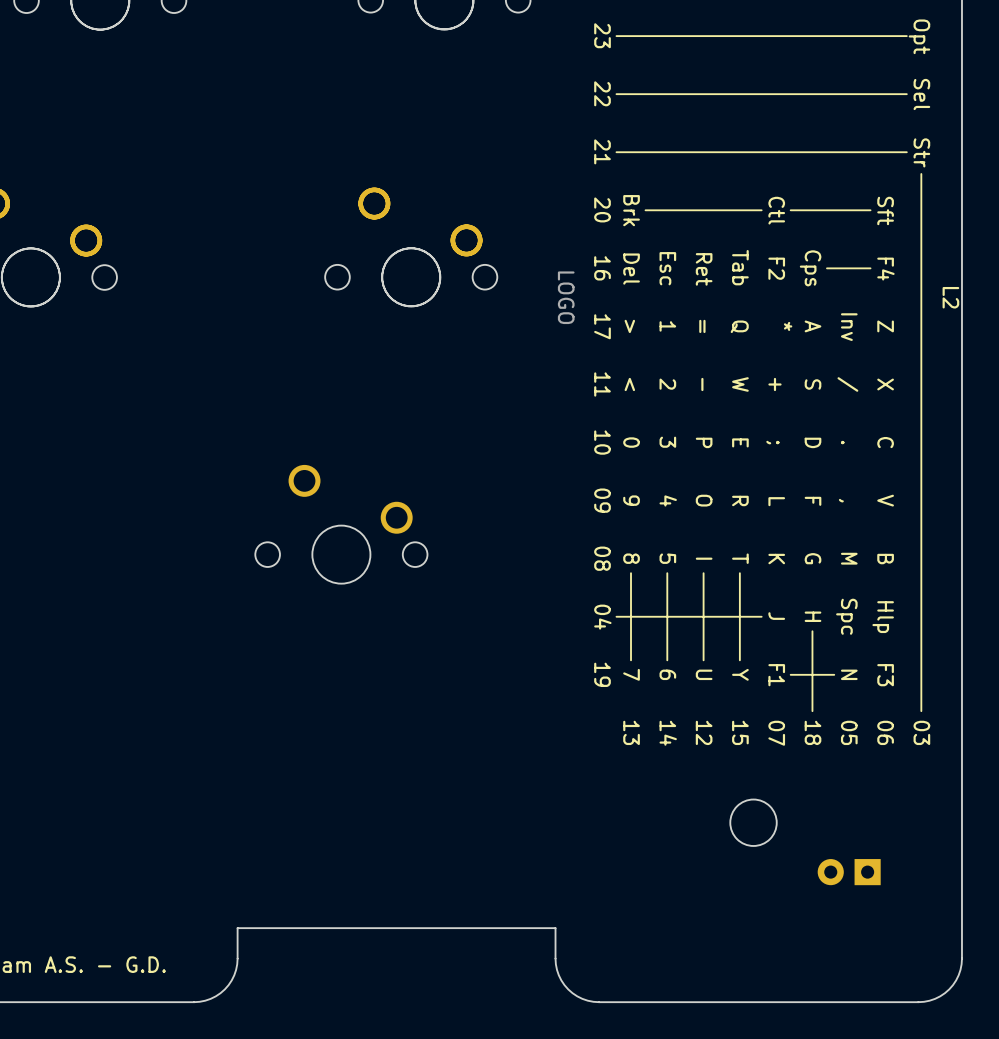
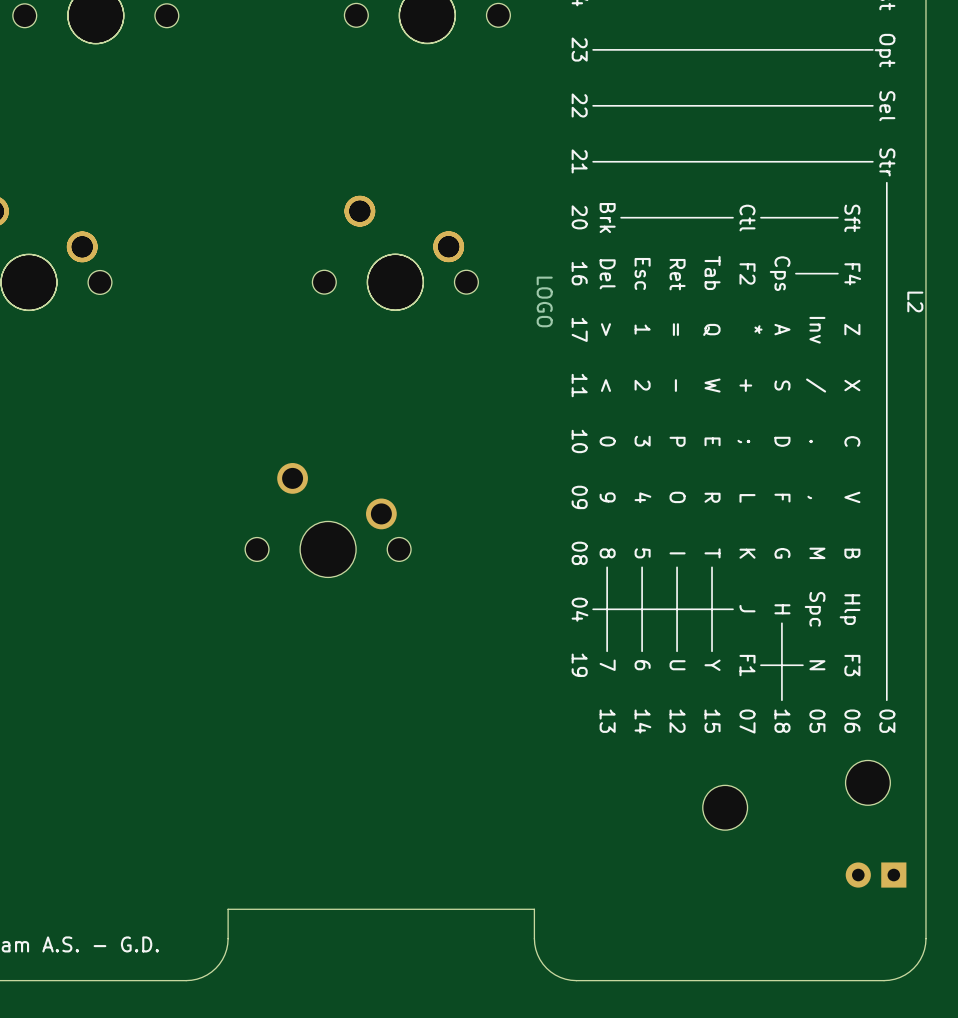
part: none -> (867, 782)
part position: (849, 872) -> (876, 875)

